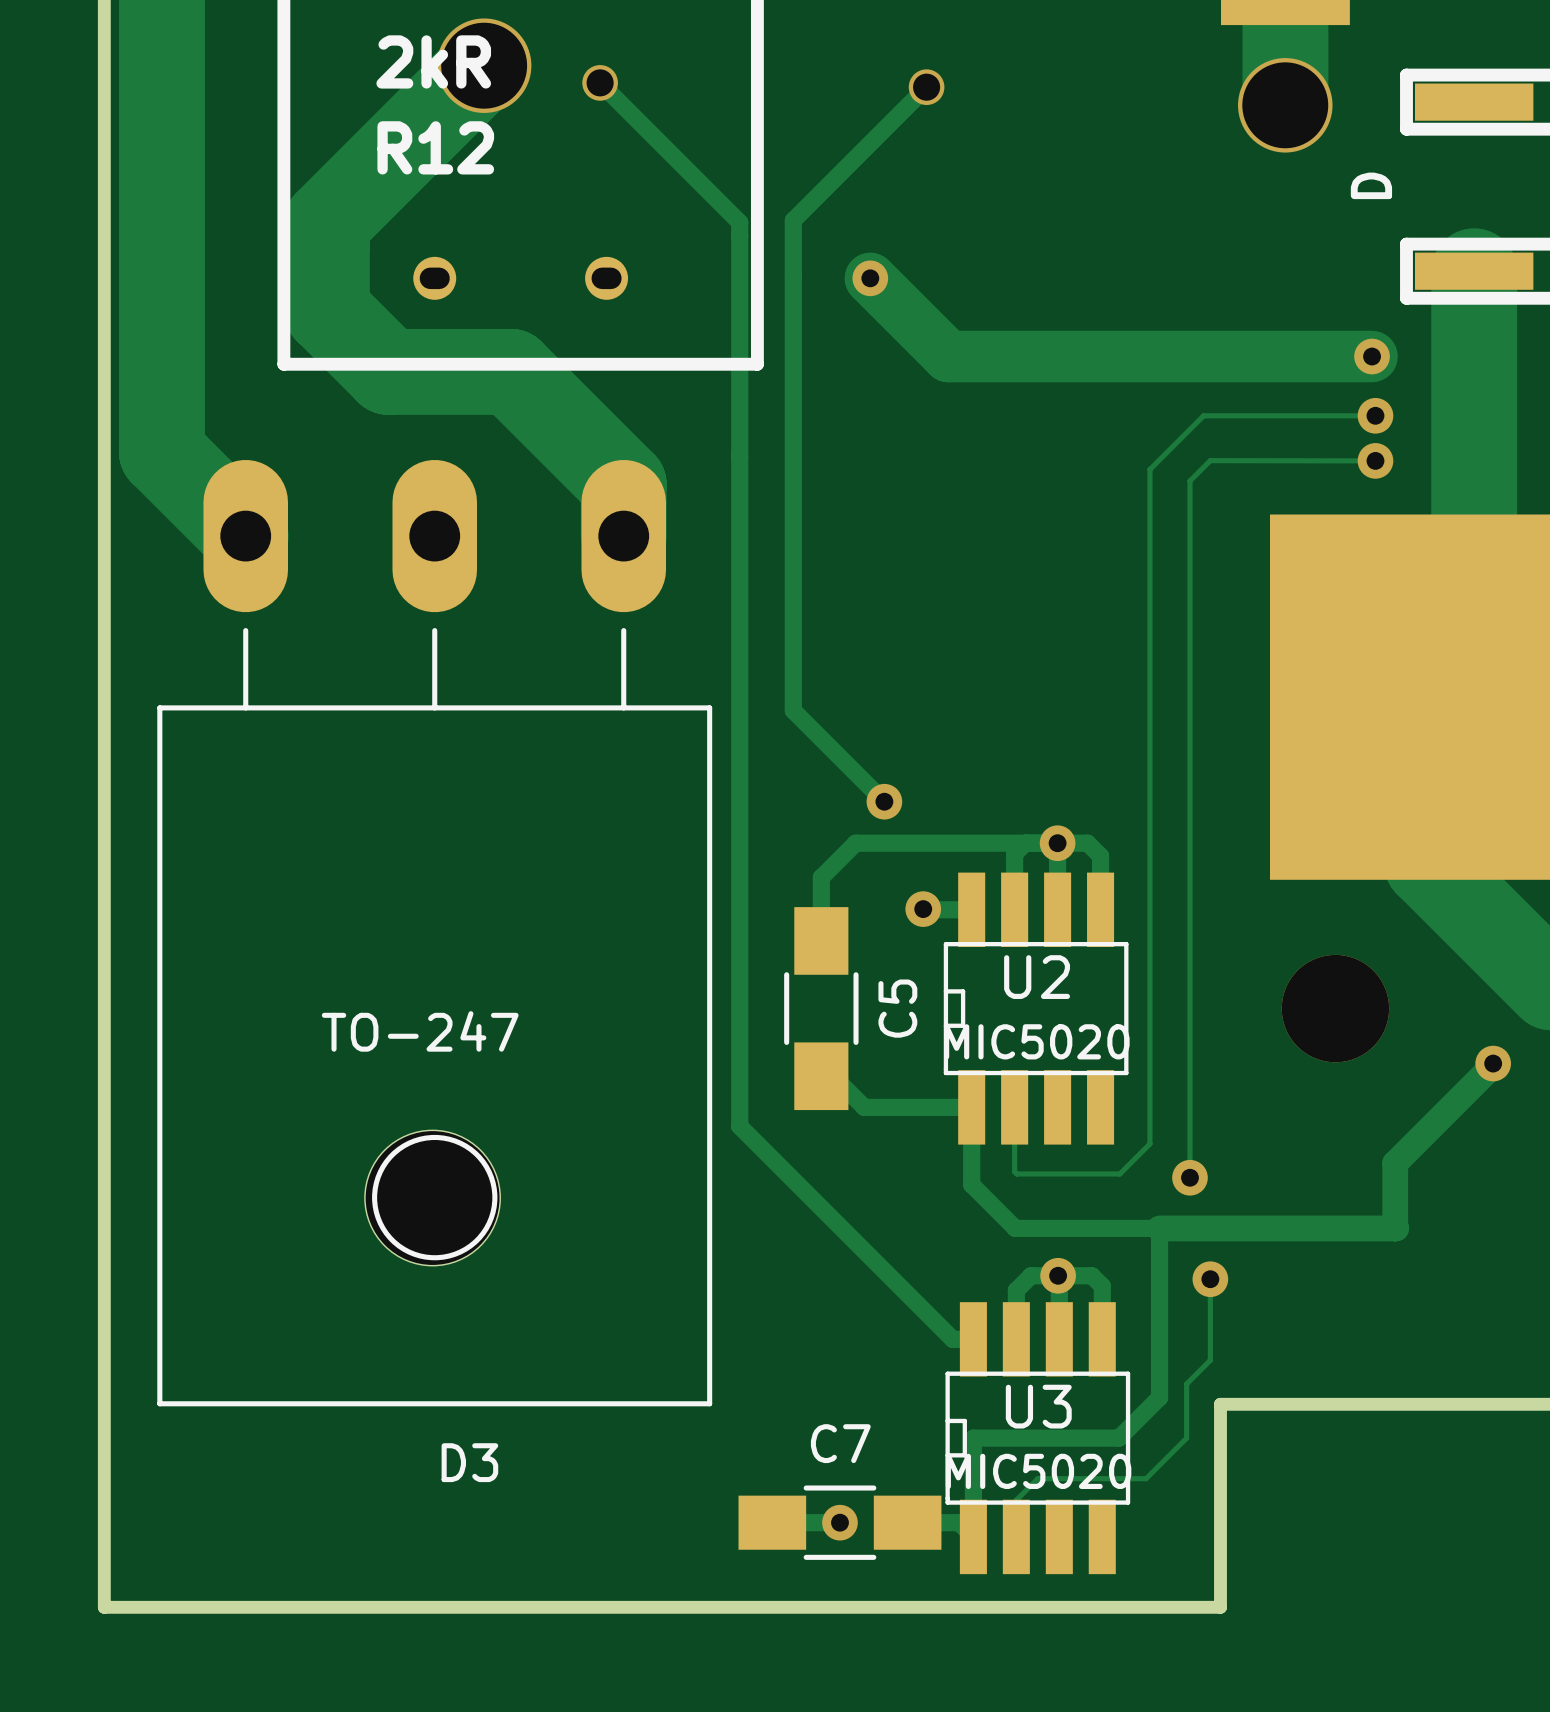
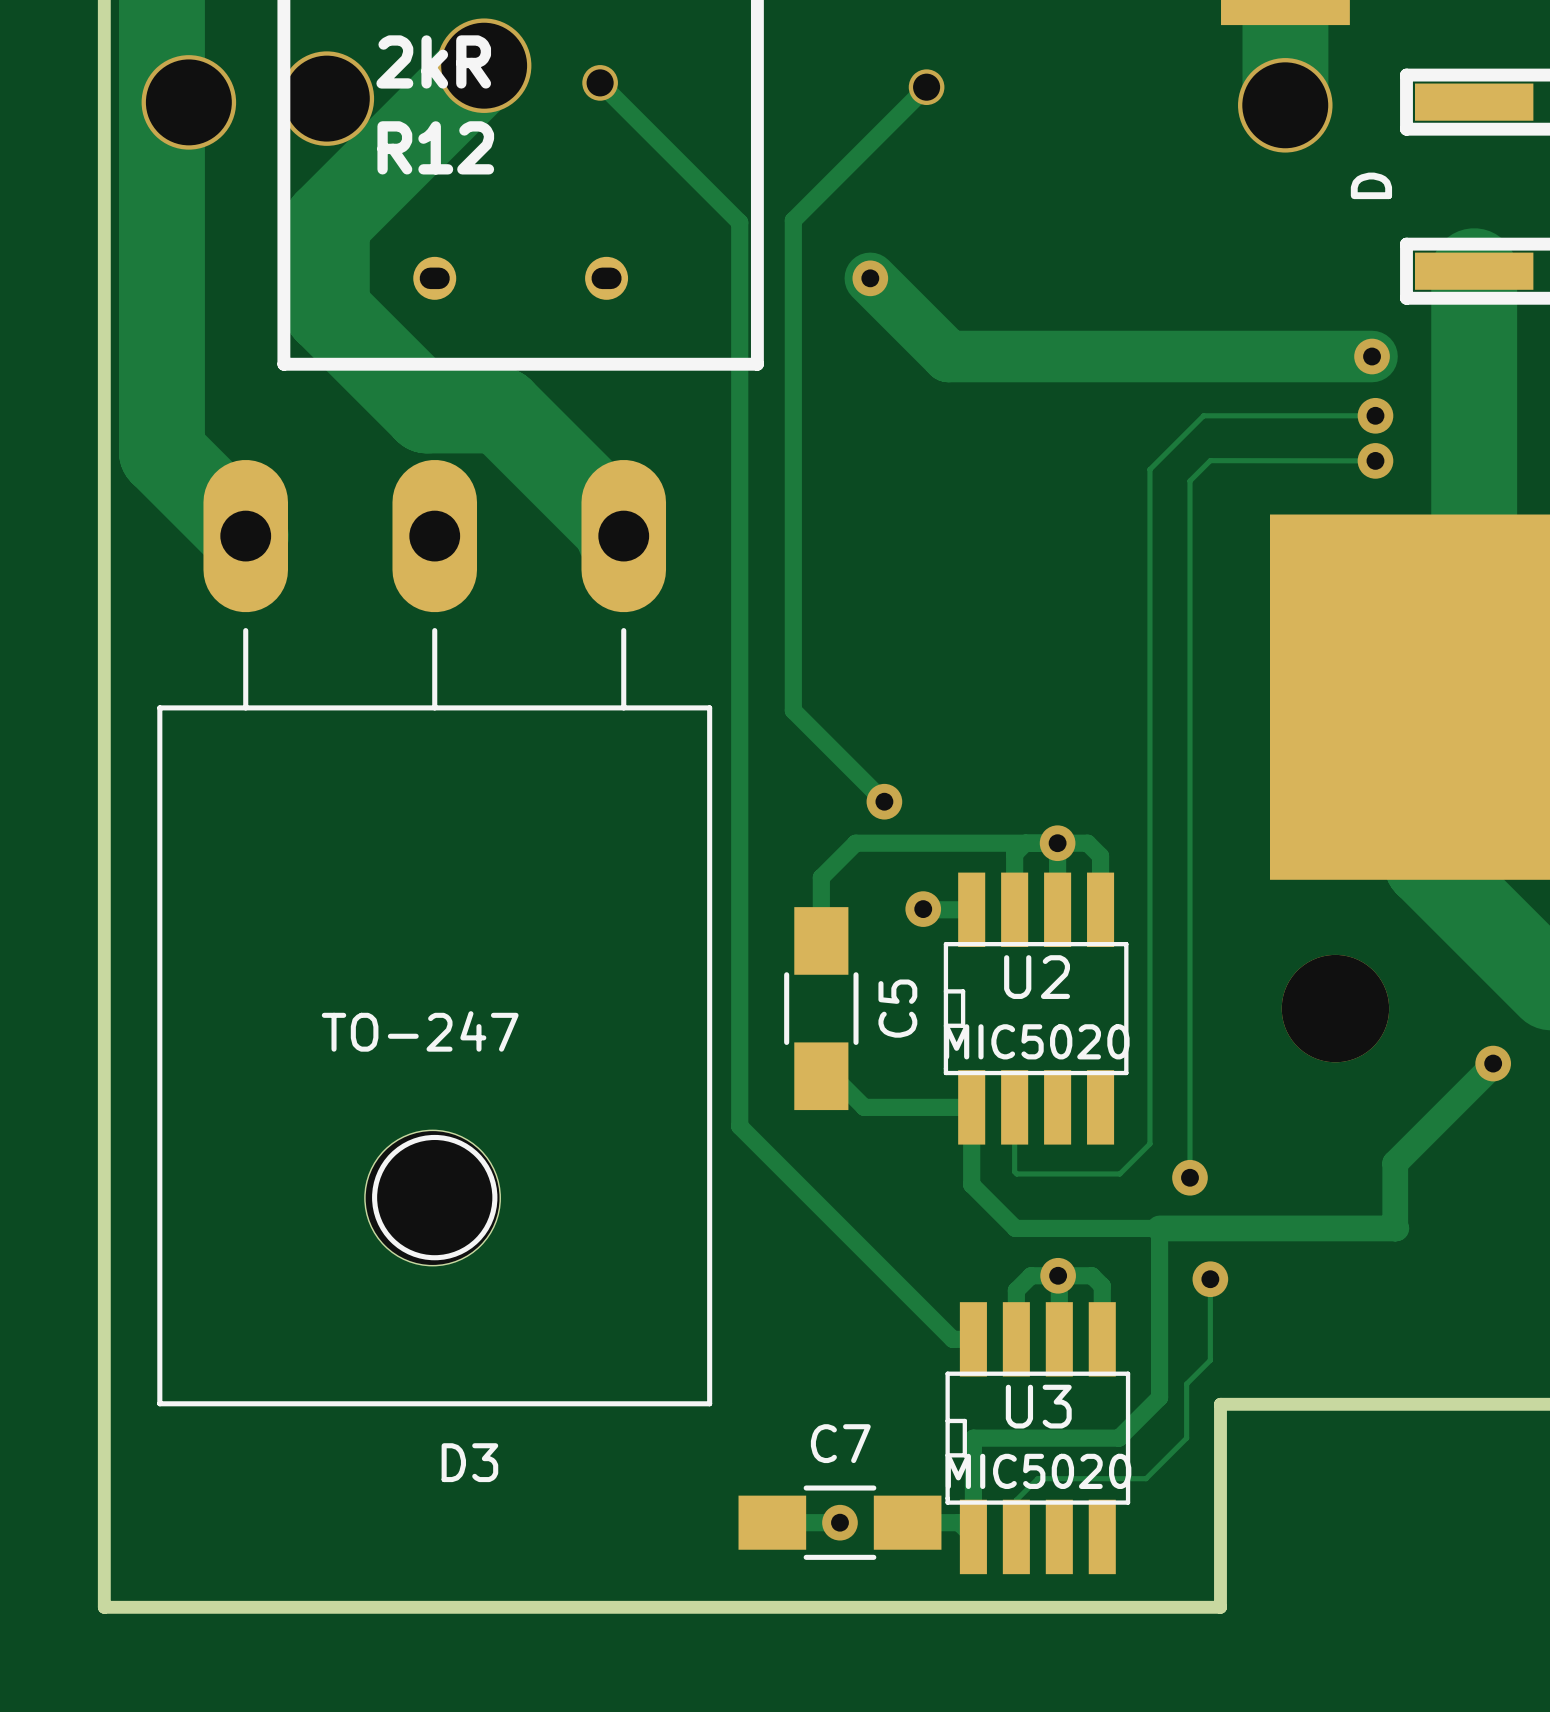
via: none -> (326, 98)
via: none -> (188, 102)
track: (388, 371) (511, 371) (623, 484) (623, 536) -> (388, 371) (427, 410) (500, 410) (619, 529) (619, 536)

